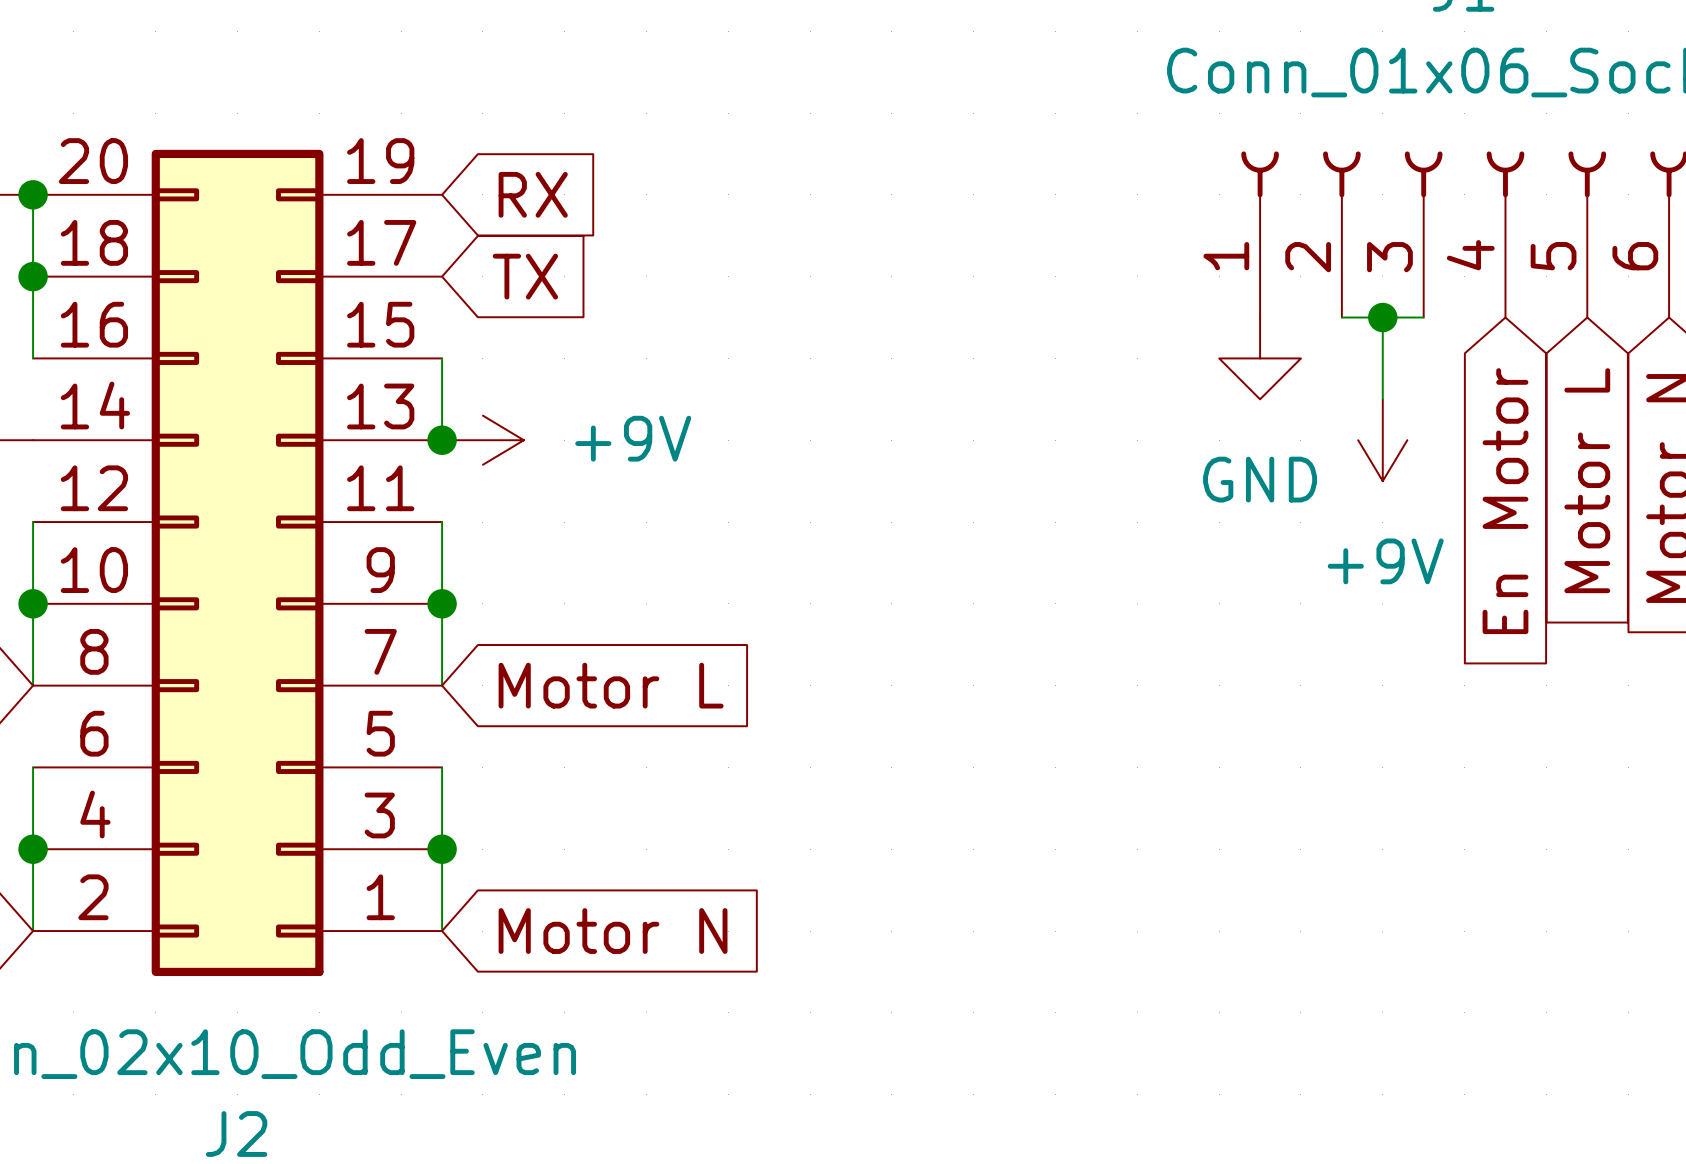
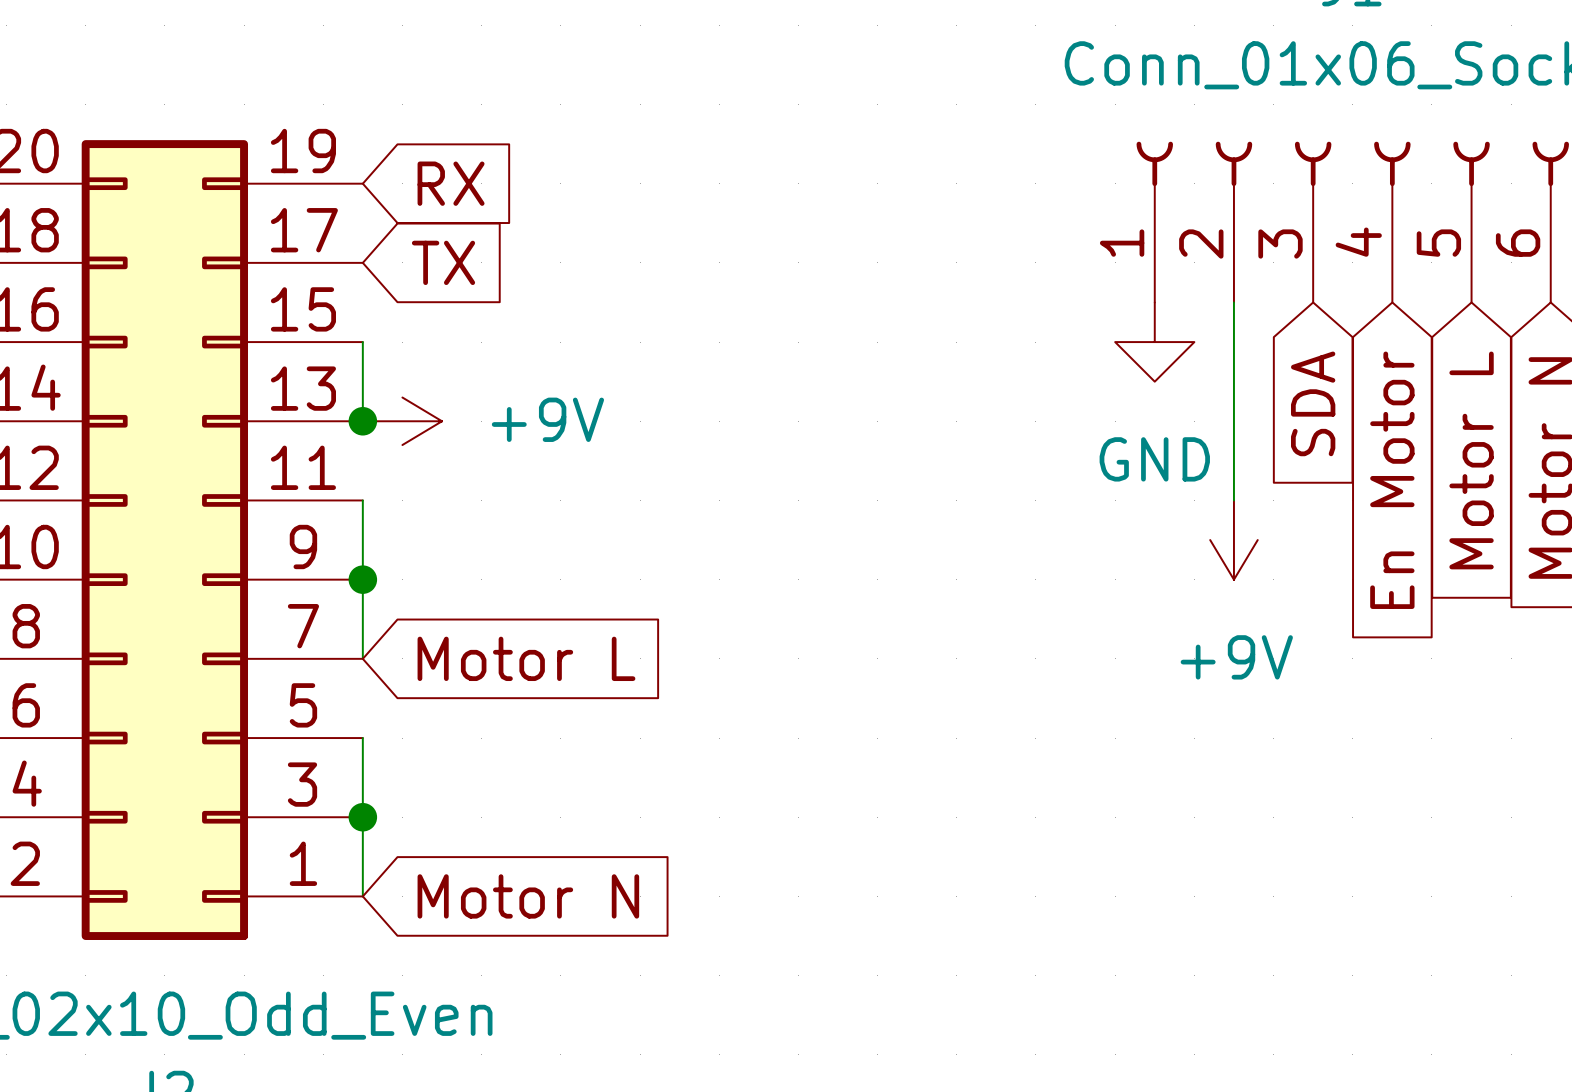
wire: (1341, 317) (1423, 317) -> (1233, 302) (1233, 500)
wire: (1382, 317) (1382, 399) -> none
junction: (1382, 317) -> none
global label: none -> SDA (1313, 403)
power symbol position: +9V (1382, 440) -> +9V (1233, 540)

